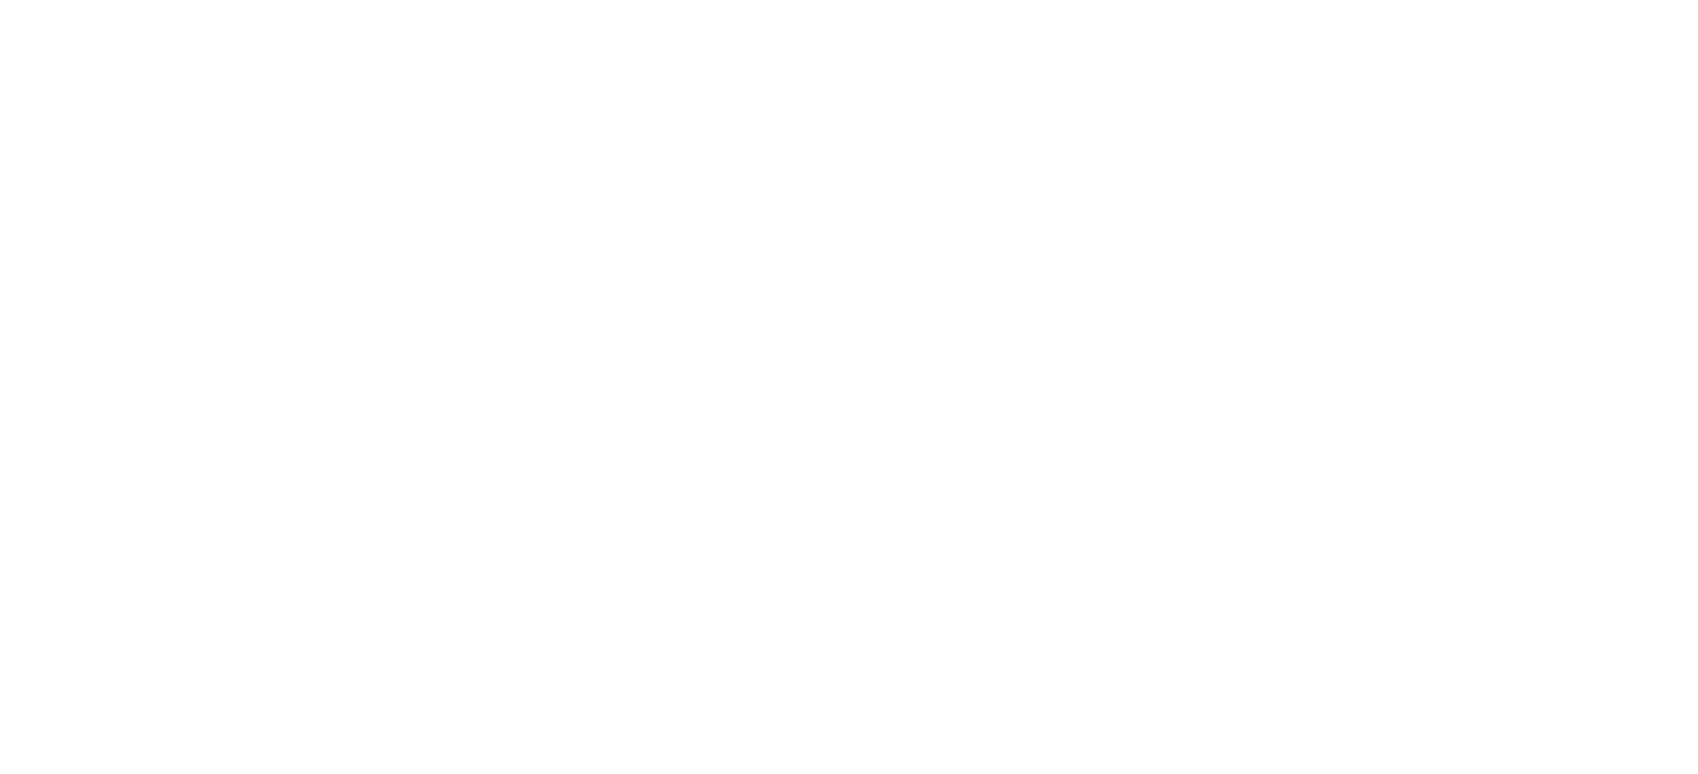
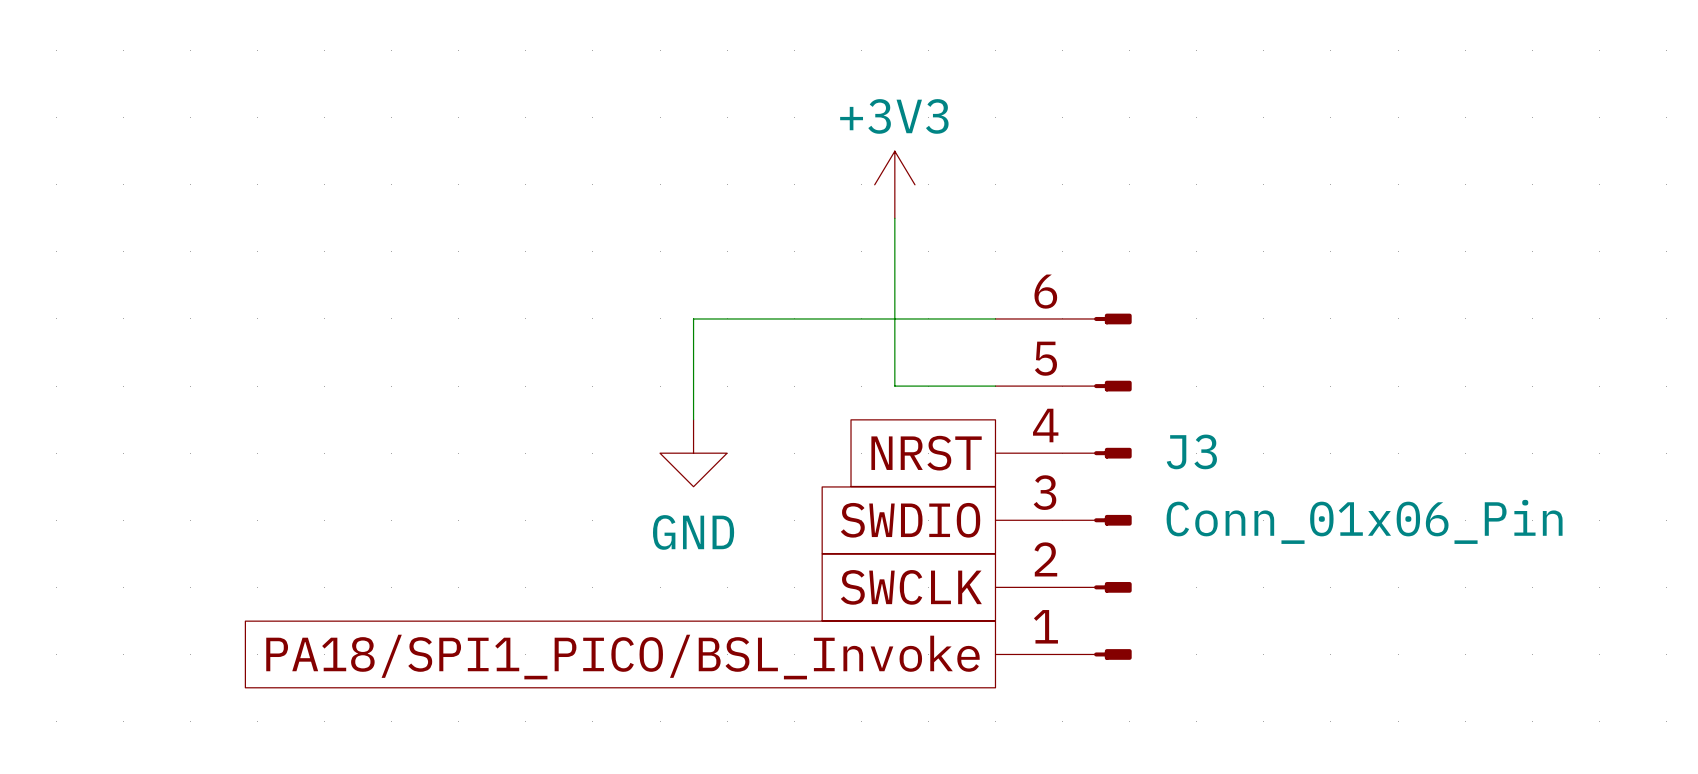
power symbol: none -> +3V3 (894, 184)
wire: none -> (894, 218) (894, 386) (995, 386)
wire: none -> (995, 318) (693, 318) (693, 419)
power symbol: none -> GND (693, 453)
global label: none -> NRST (926, 453)
J3: none -> Conn_01x06_Pin (1063, 486)
global label: none -> SWDIO (910, 520)
global label: none -> SWCLK (911, 587)
global label: none -> PA18/SPI1_PICO/BSL_Invoke (622, 657)

